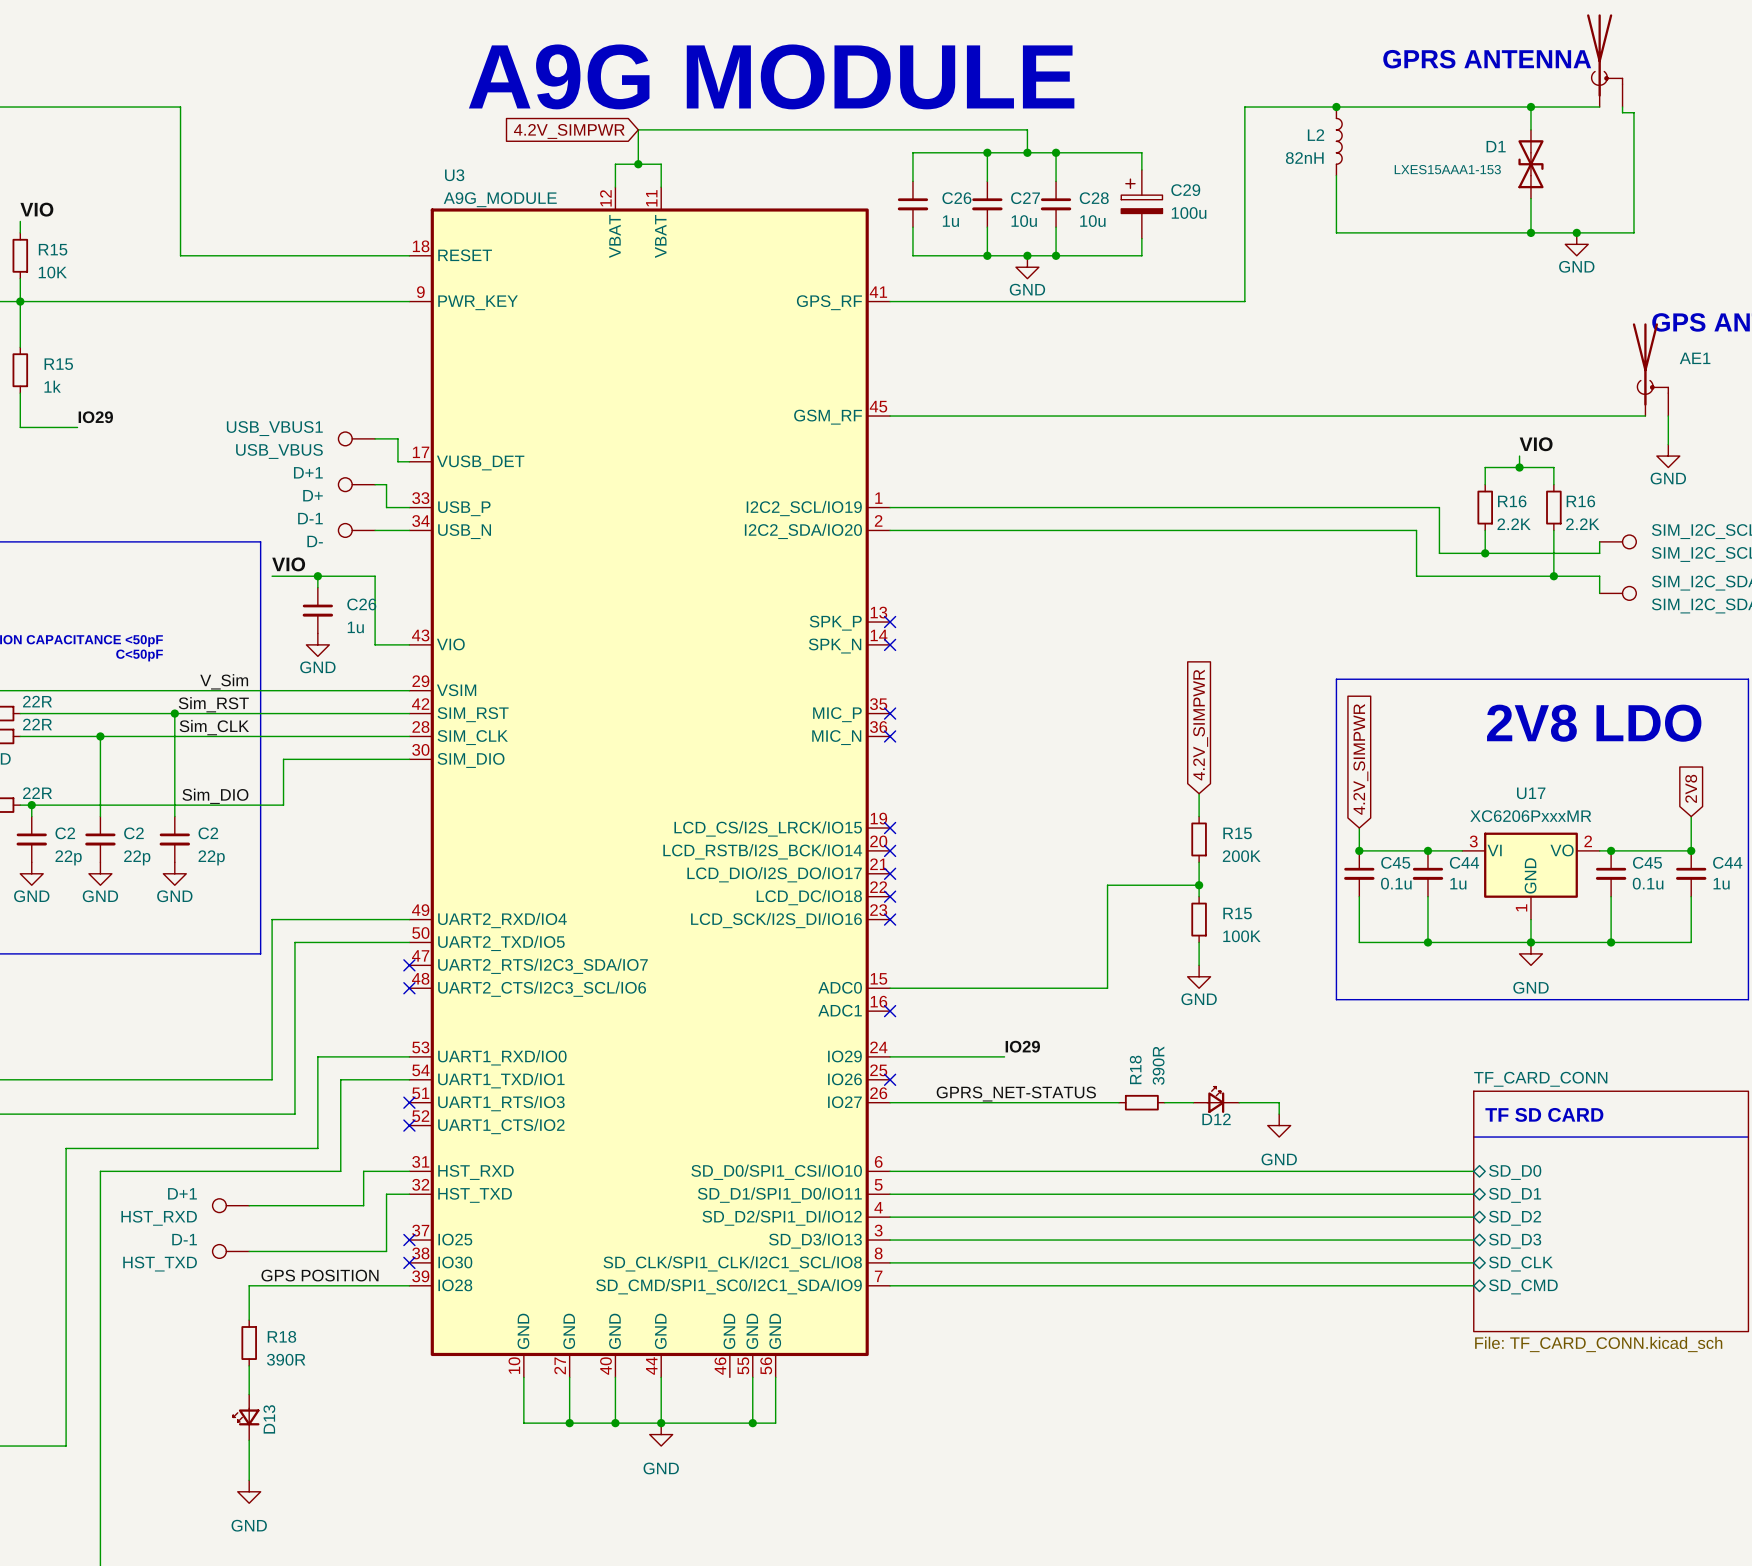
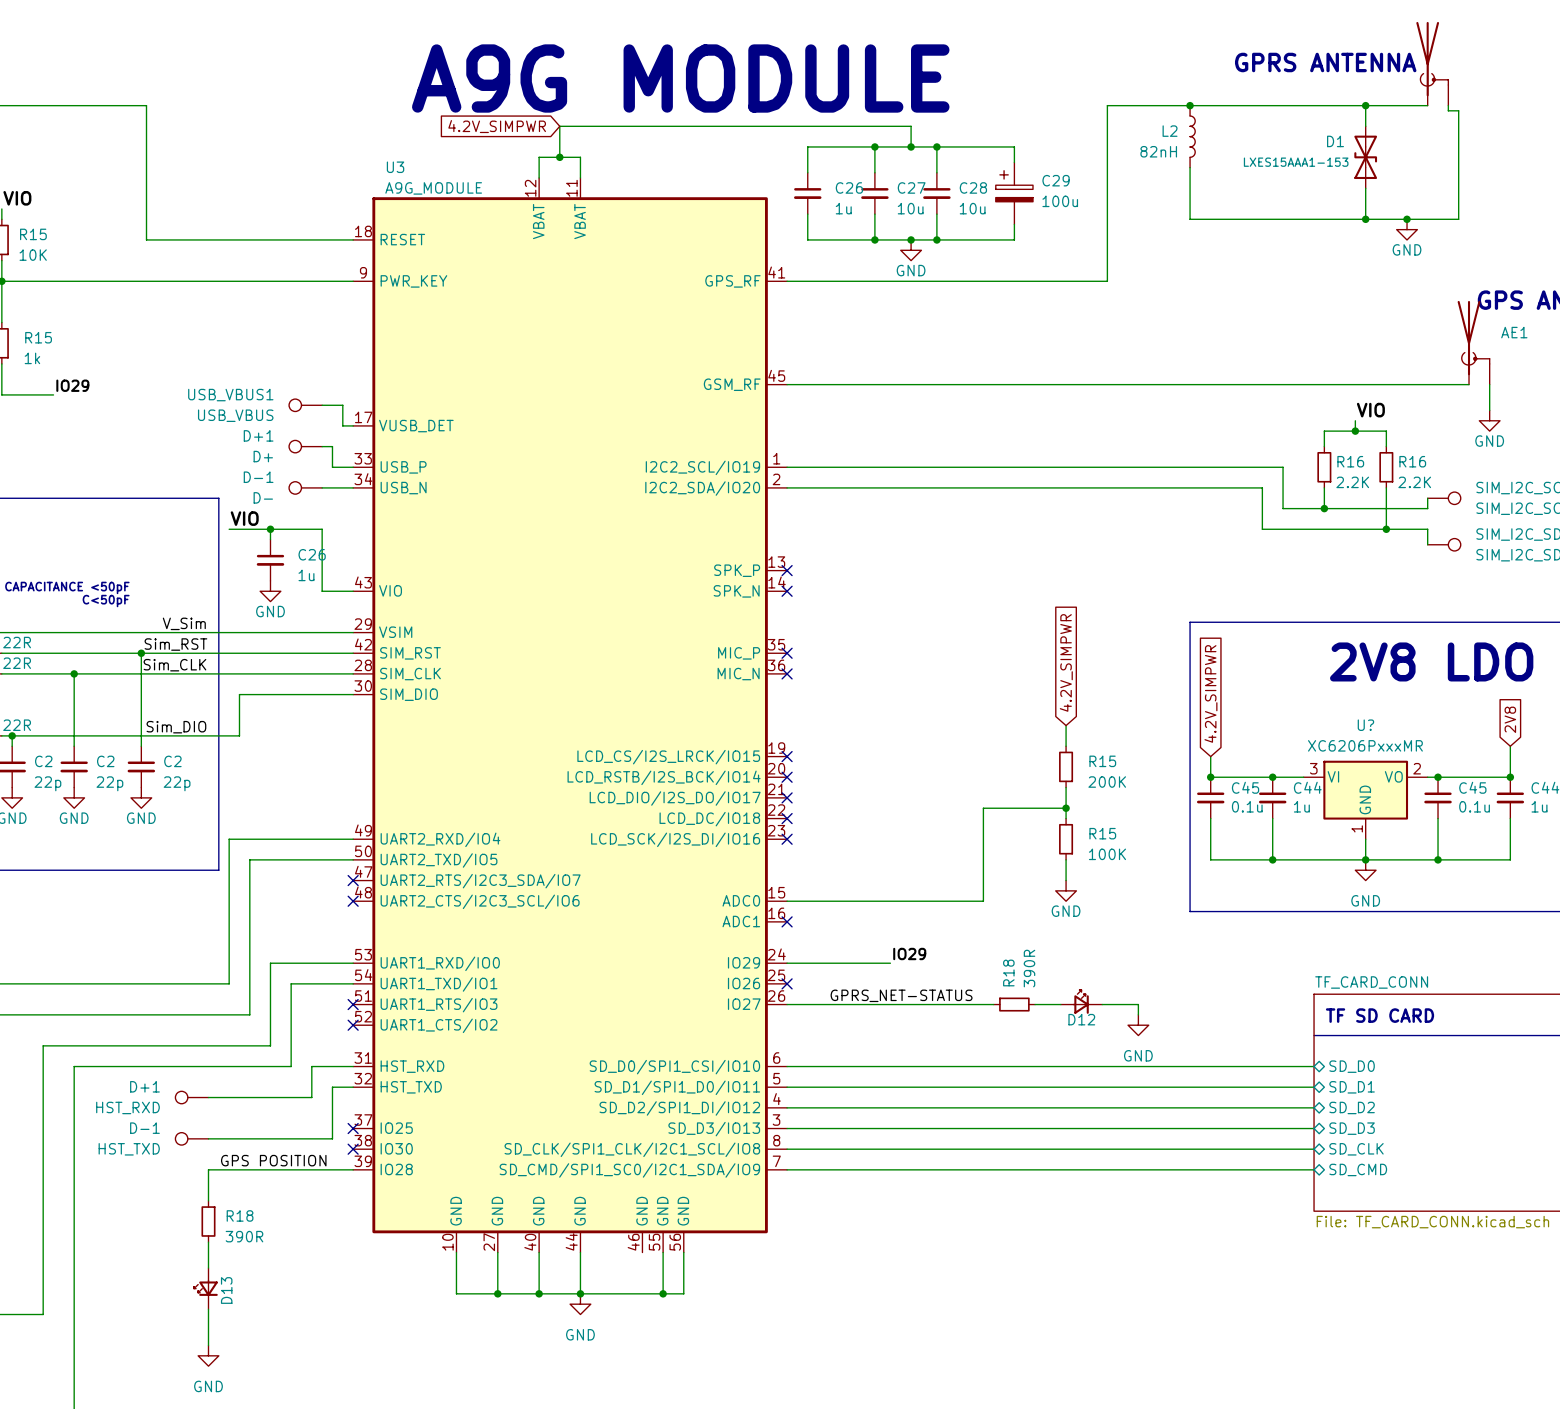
U17 name: U17 (1531, 793) -> U? (1365, 725)

